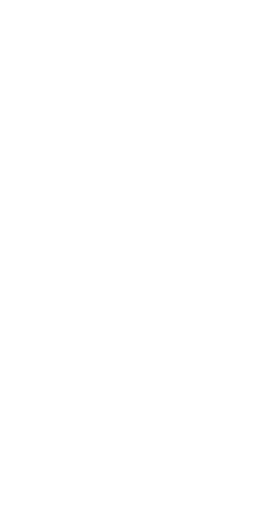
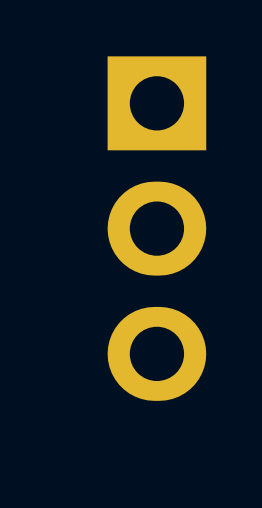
part: none -> (156, 228)

